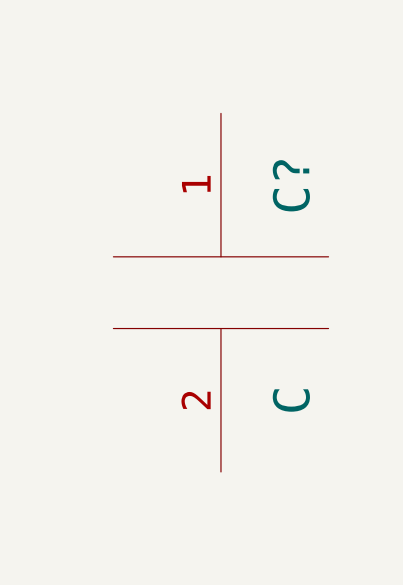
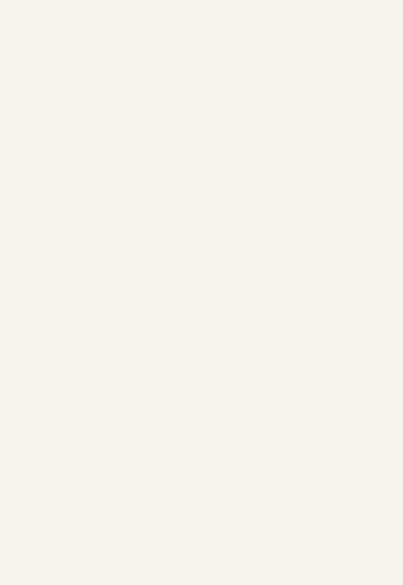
C?: C (220, 292) -> none

